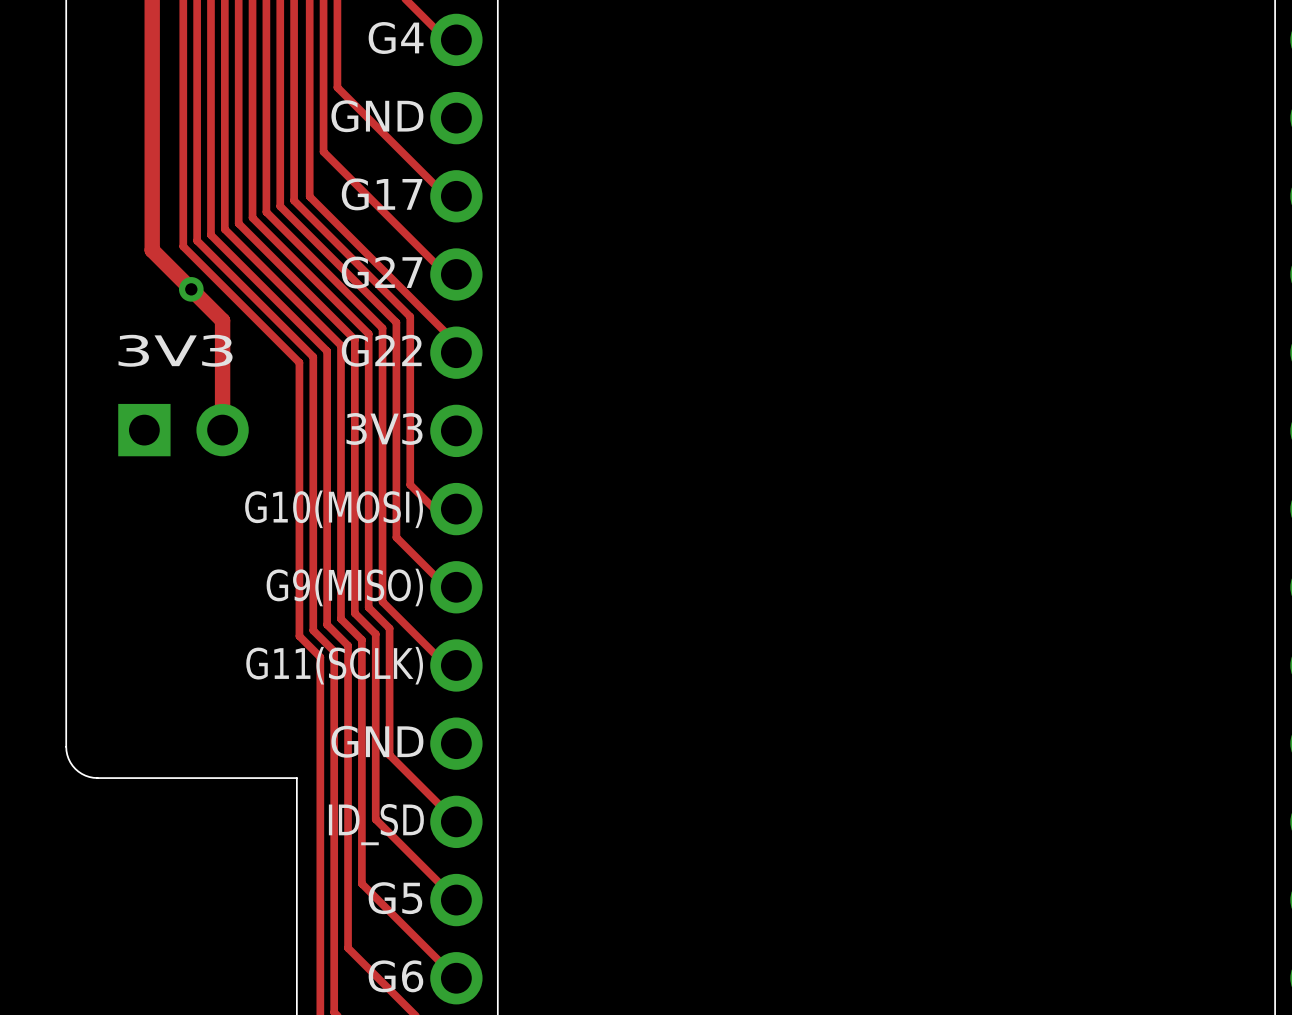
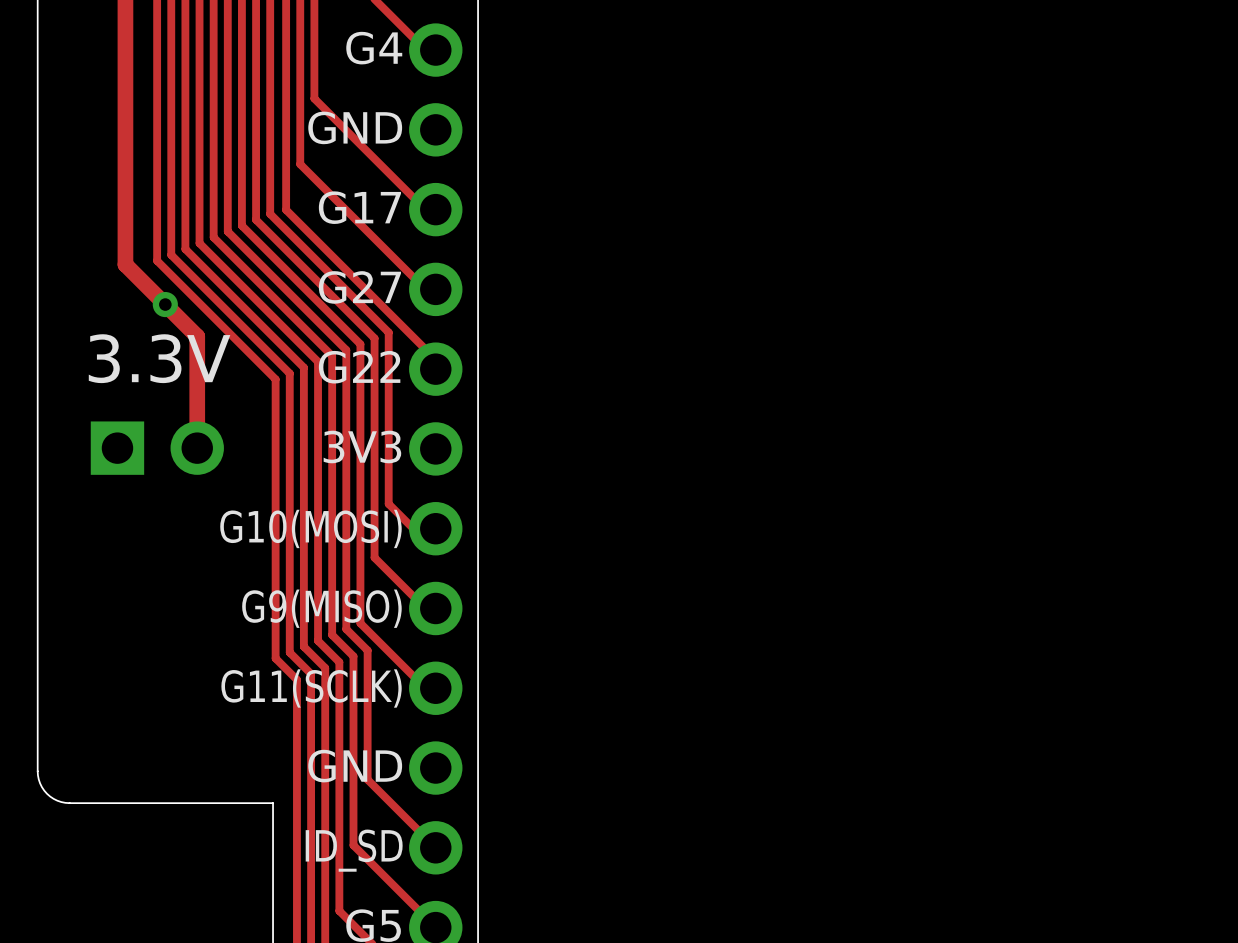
text: 3V3 (175, 350) -> 3.3V (159, 358)

